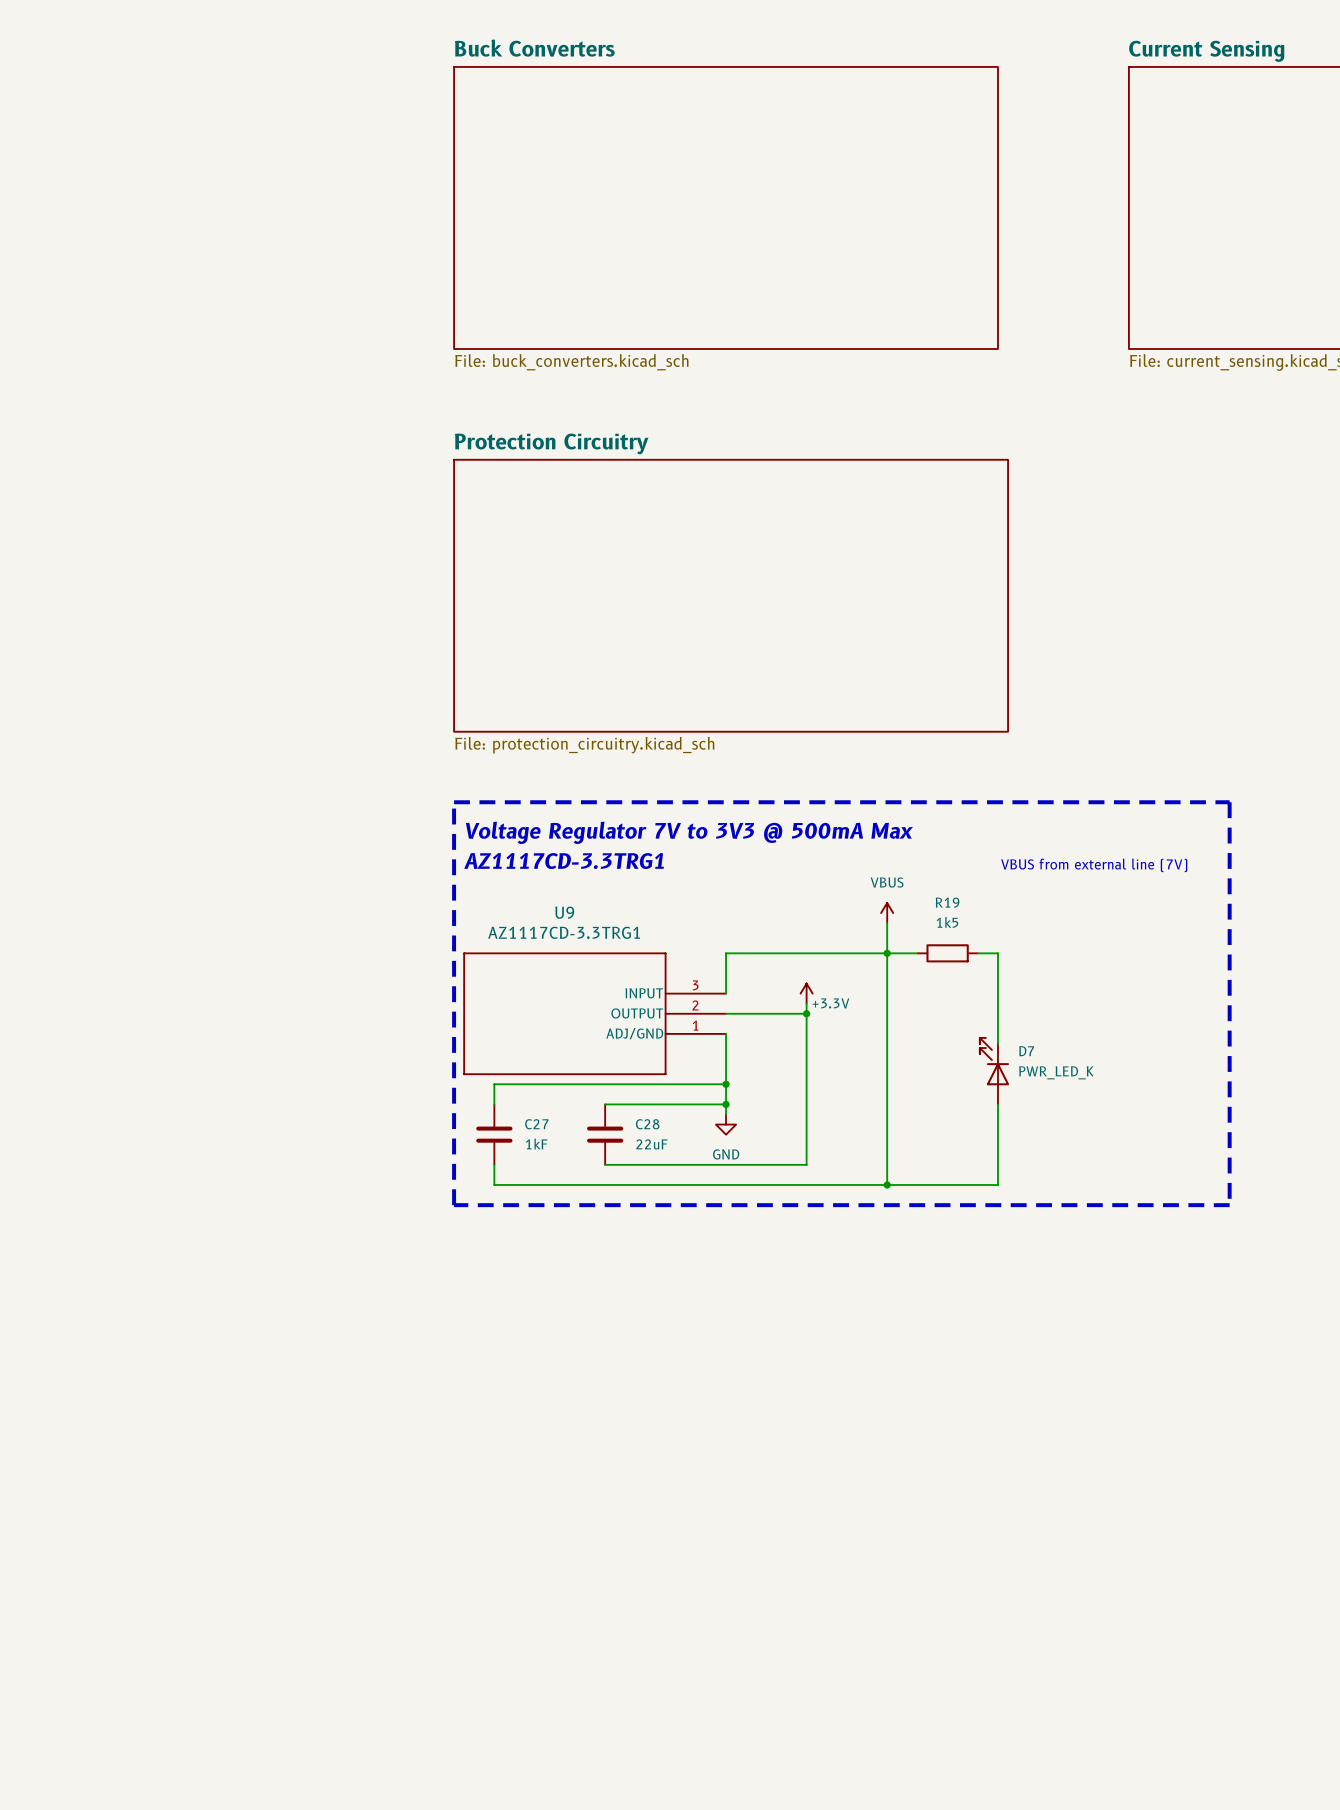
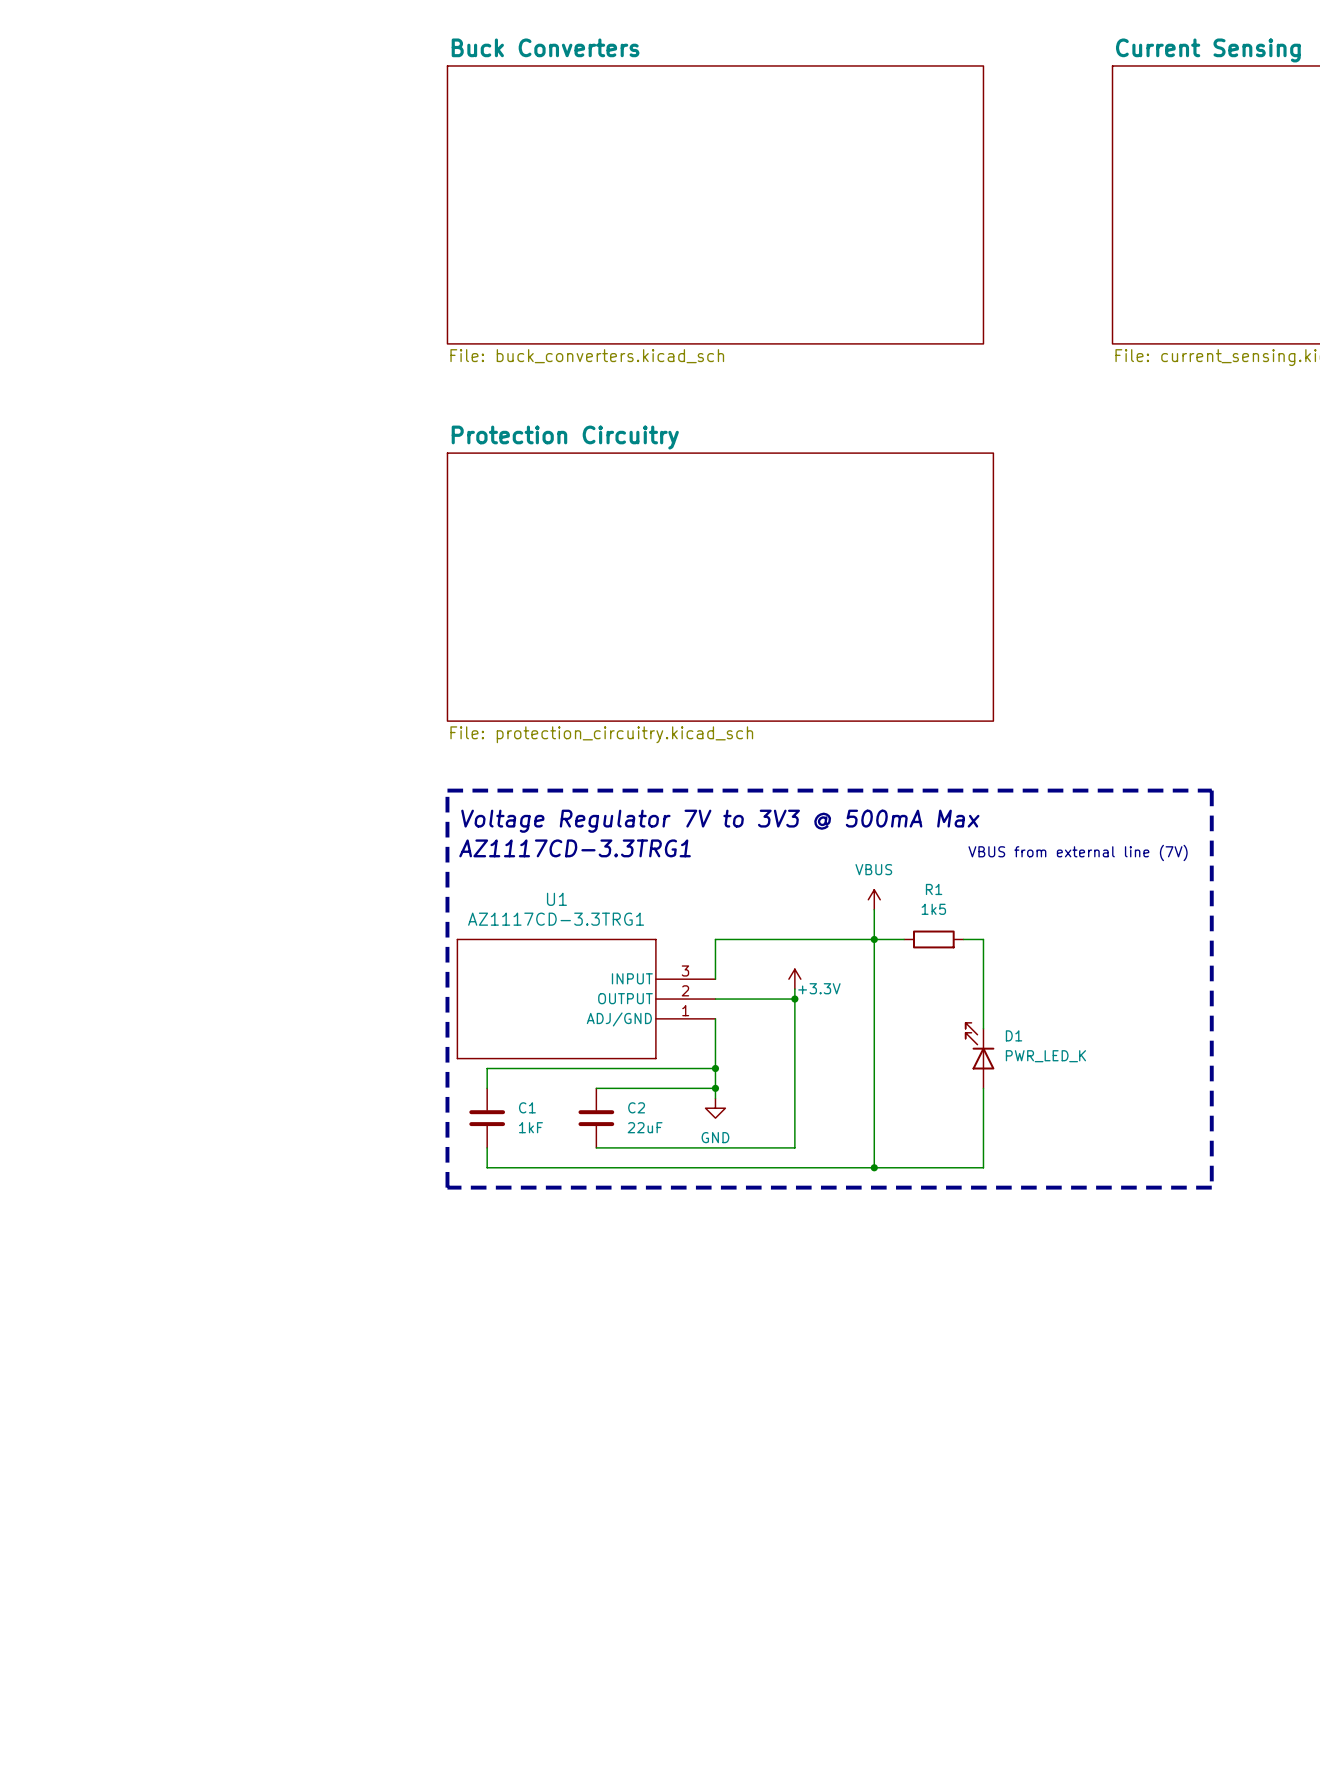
R19 name: R19 (947, 902) -> R1 (934, 889)
U9 name: U9 (564, 912) -> U1 (556, 899)
D7 name: D7 (1026, 1051) -> D1 (1014, 1035)
C27 name: C27 (536, 1124) -> C1 (527, 1107)
C28 name: C28 (647, 1124) -> C2 (636, 1107)

